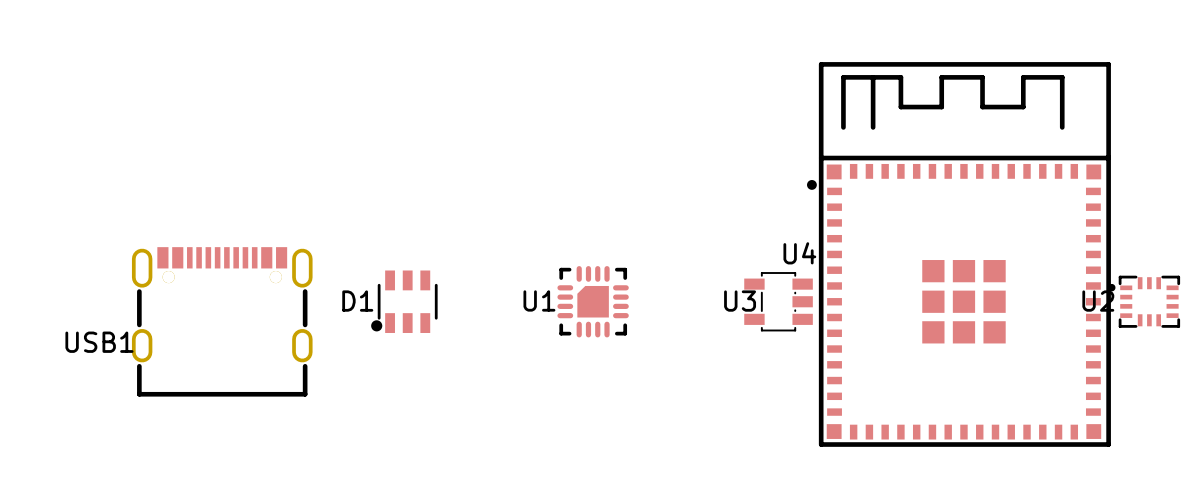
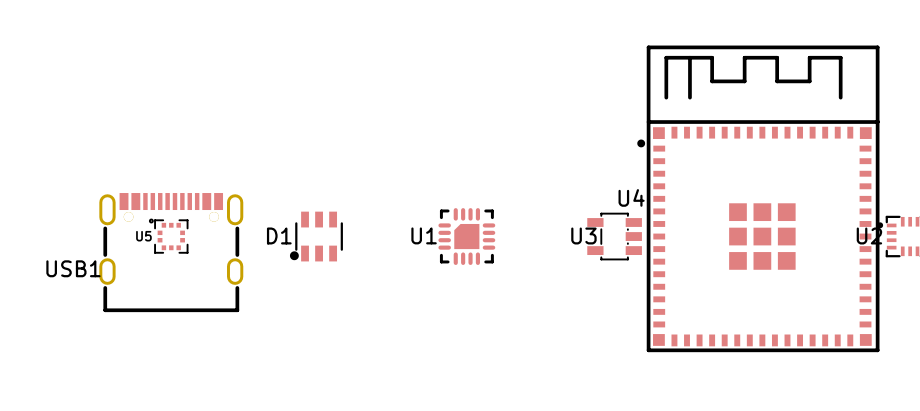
U5: none -> (168, 236)

